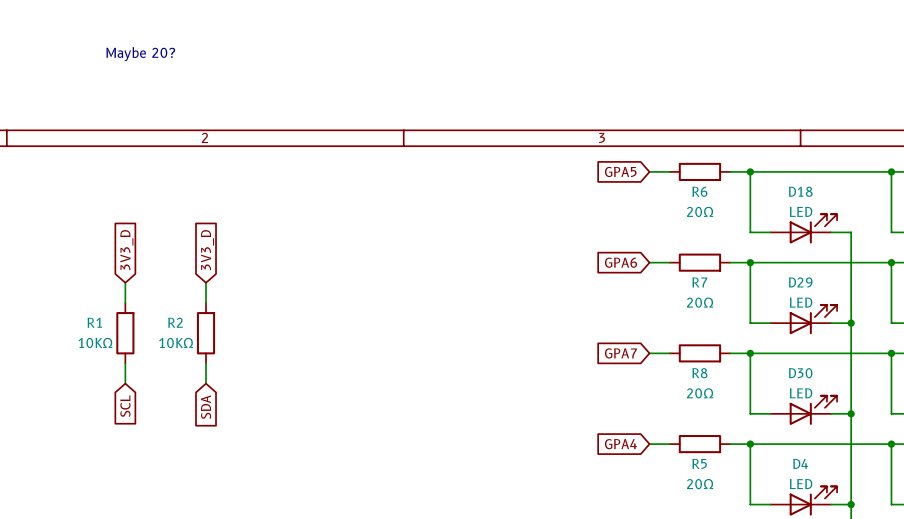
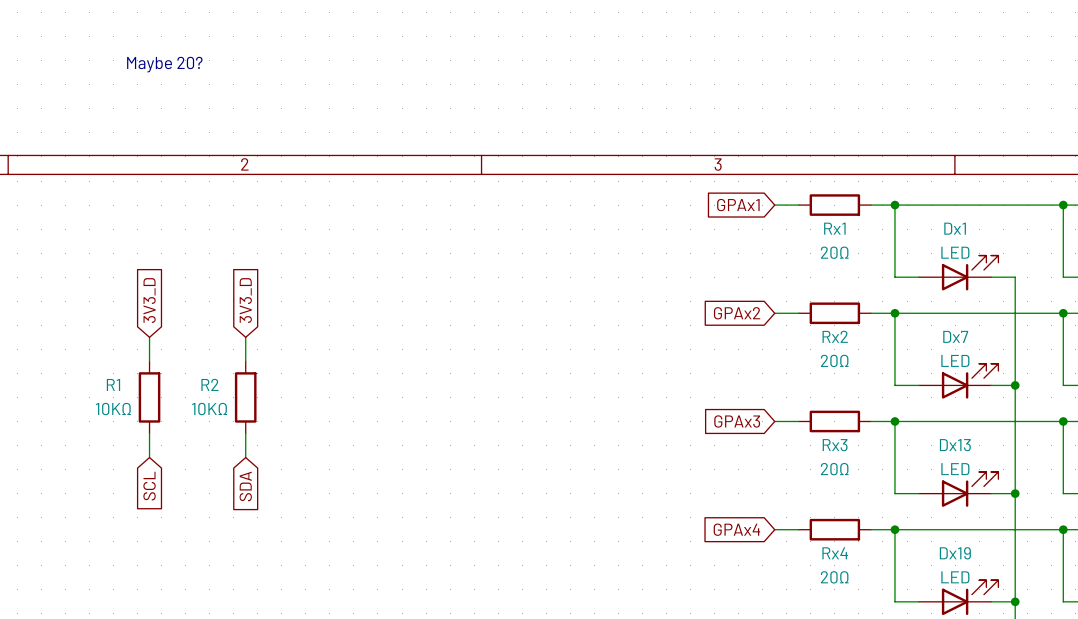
global label: GPA5 (620, 171) -> GPAx1 (738, 205)
R6 name: R6 (699, 191) -> Rx1 (834, 228)
D18 name: D18 (800, 191) -> Dx1 (955, 228)
global label: GPA6 (621, 262) -> GPAx2 (737, 313)
R7 name: R7 (699, 282) -> Rx2 (835, 336)
D29 name: D29 (800, 282) -> Dx7 (955, 336)
global label: GPA7 (620, 353) -> GPAx3 (737, 421)
R8 name: R8 (699, 373) -> Rx3 (835, 445)
D30 name: D30 (800, 373) -> Dx13 (955, 445)
global label: GPA4 (620, 444) -> GPAx4 (736, 529)
R5 name: R5 (699, 463) -> Rx4 (835, 553)
D4 name: D4 (800, 463) -> Dx19 (955, 553)

